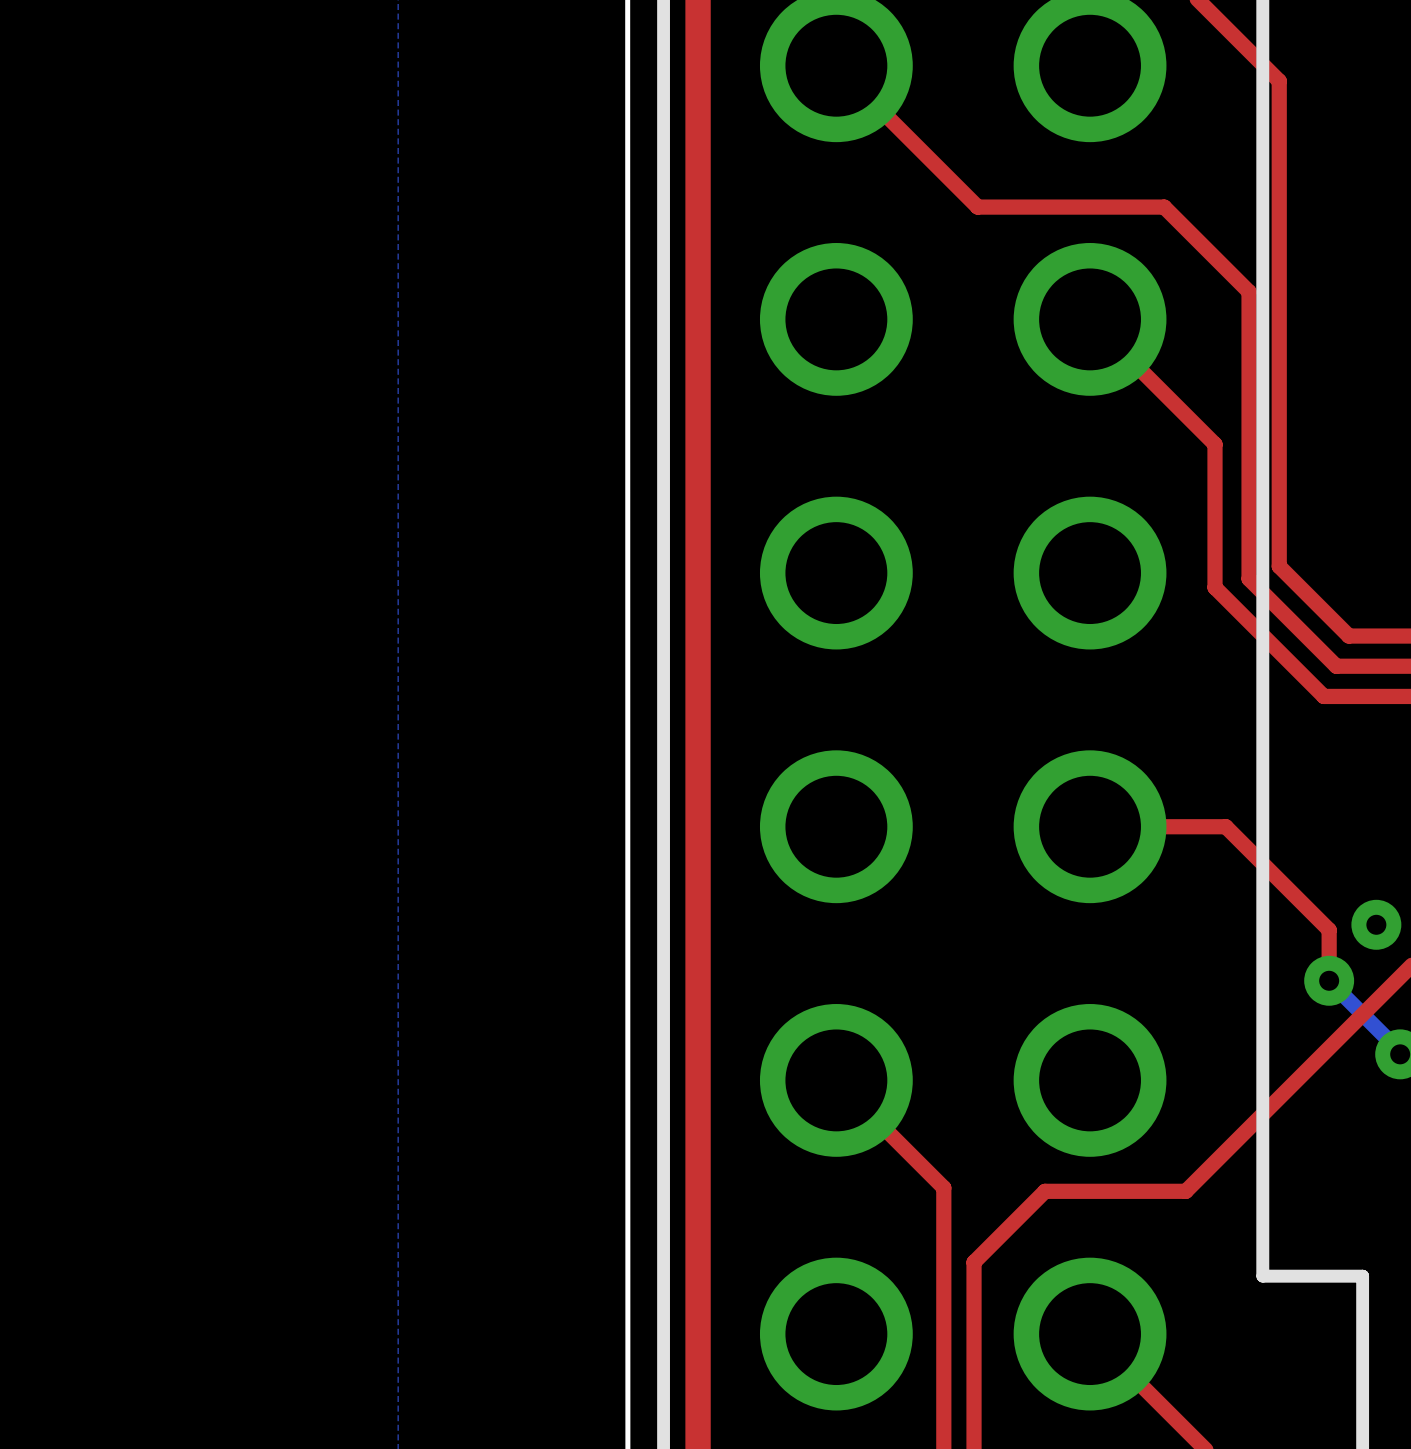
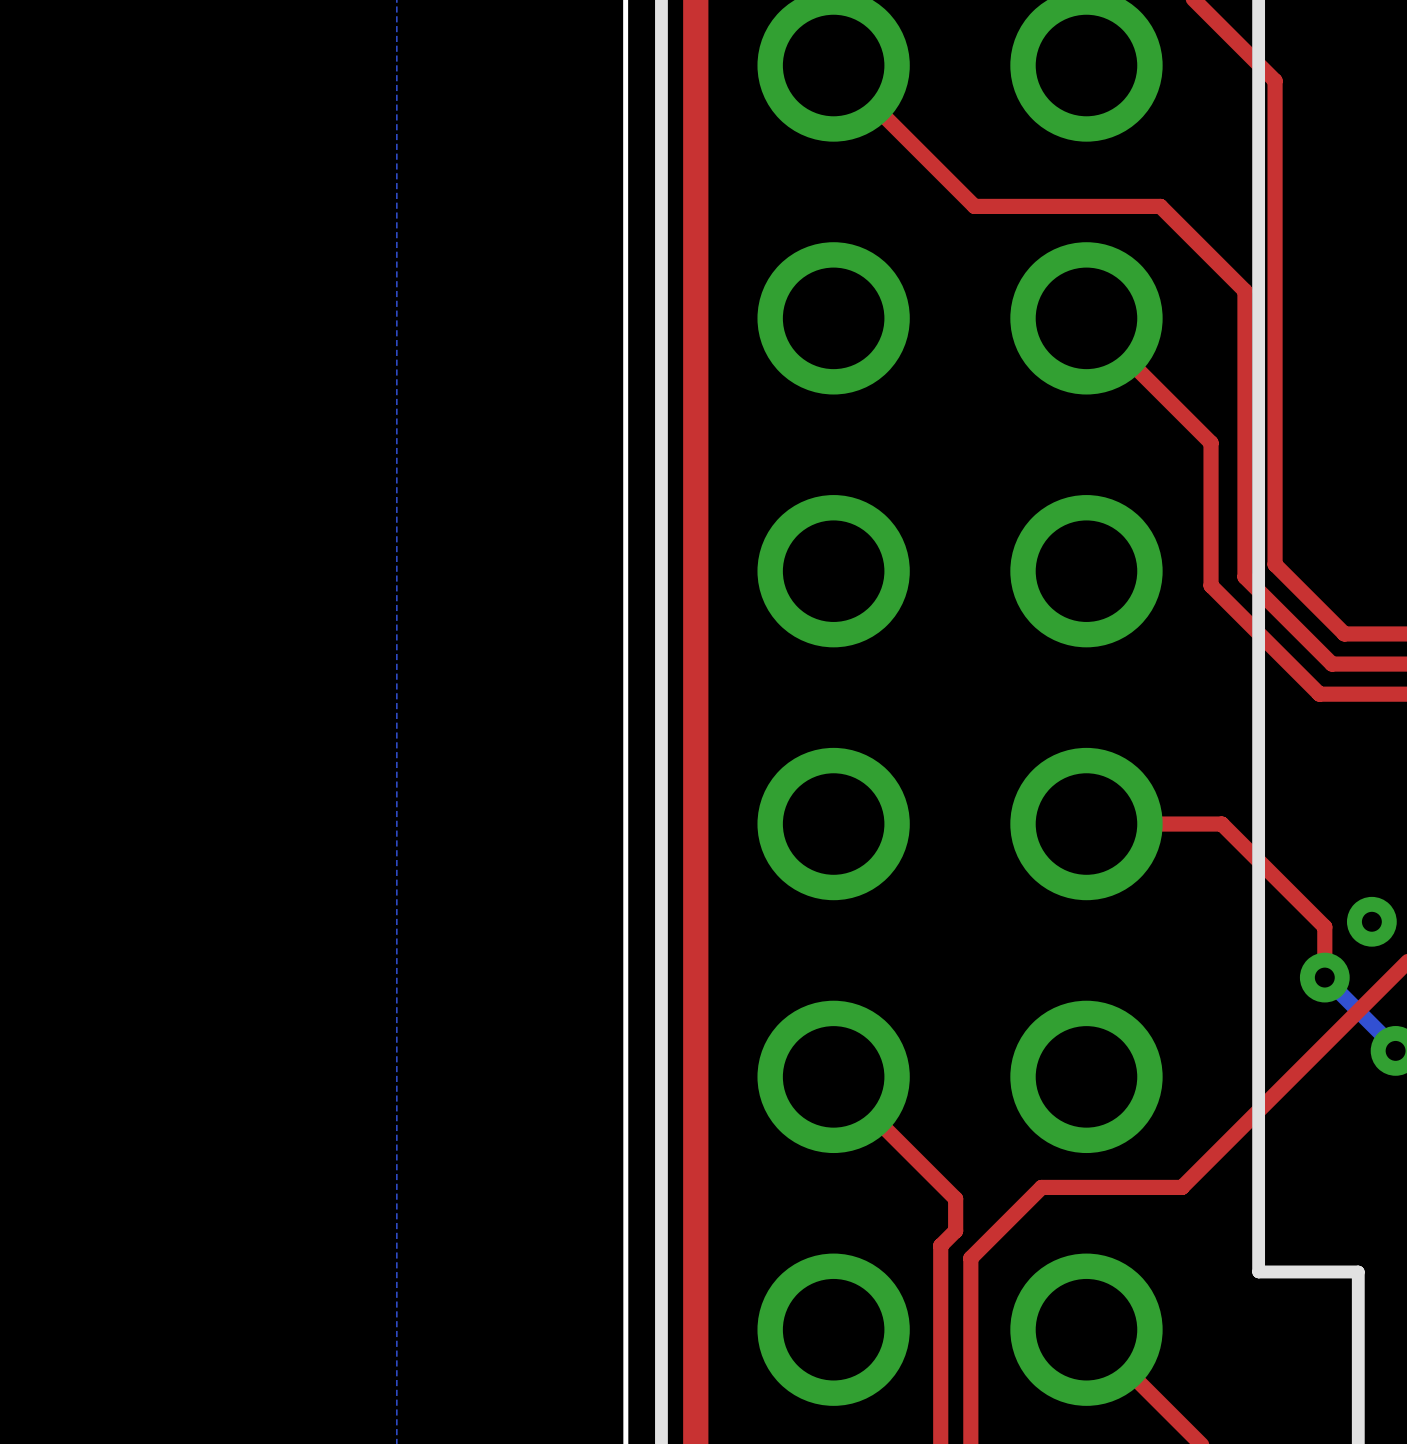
top track: (943, 1187) (943, 1249) -> (940, 1183) (955, 1198) (955, 1230) (940, 1245)

